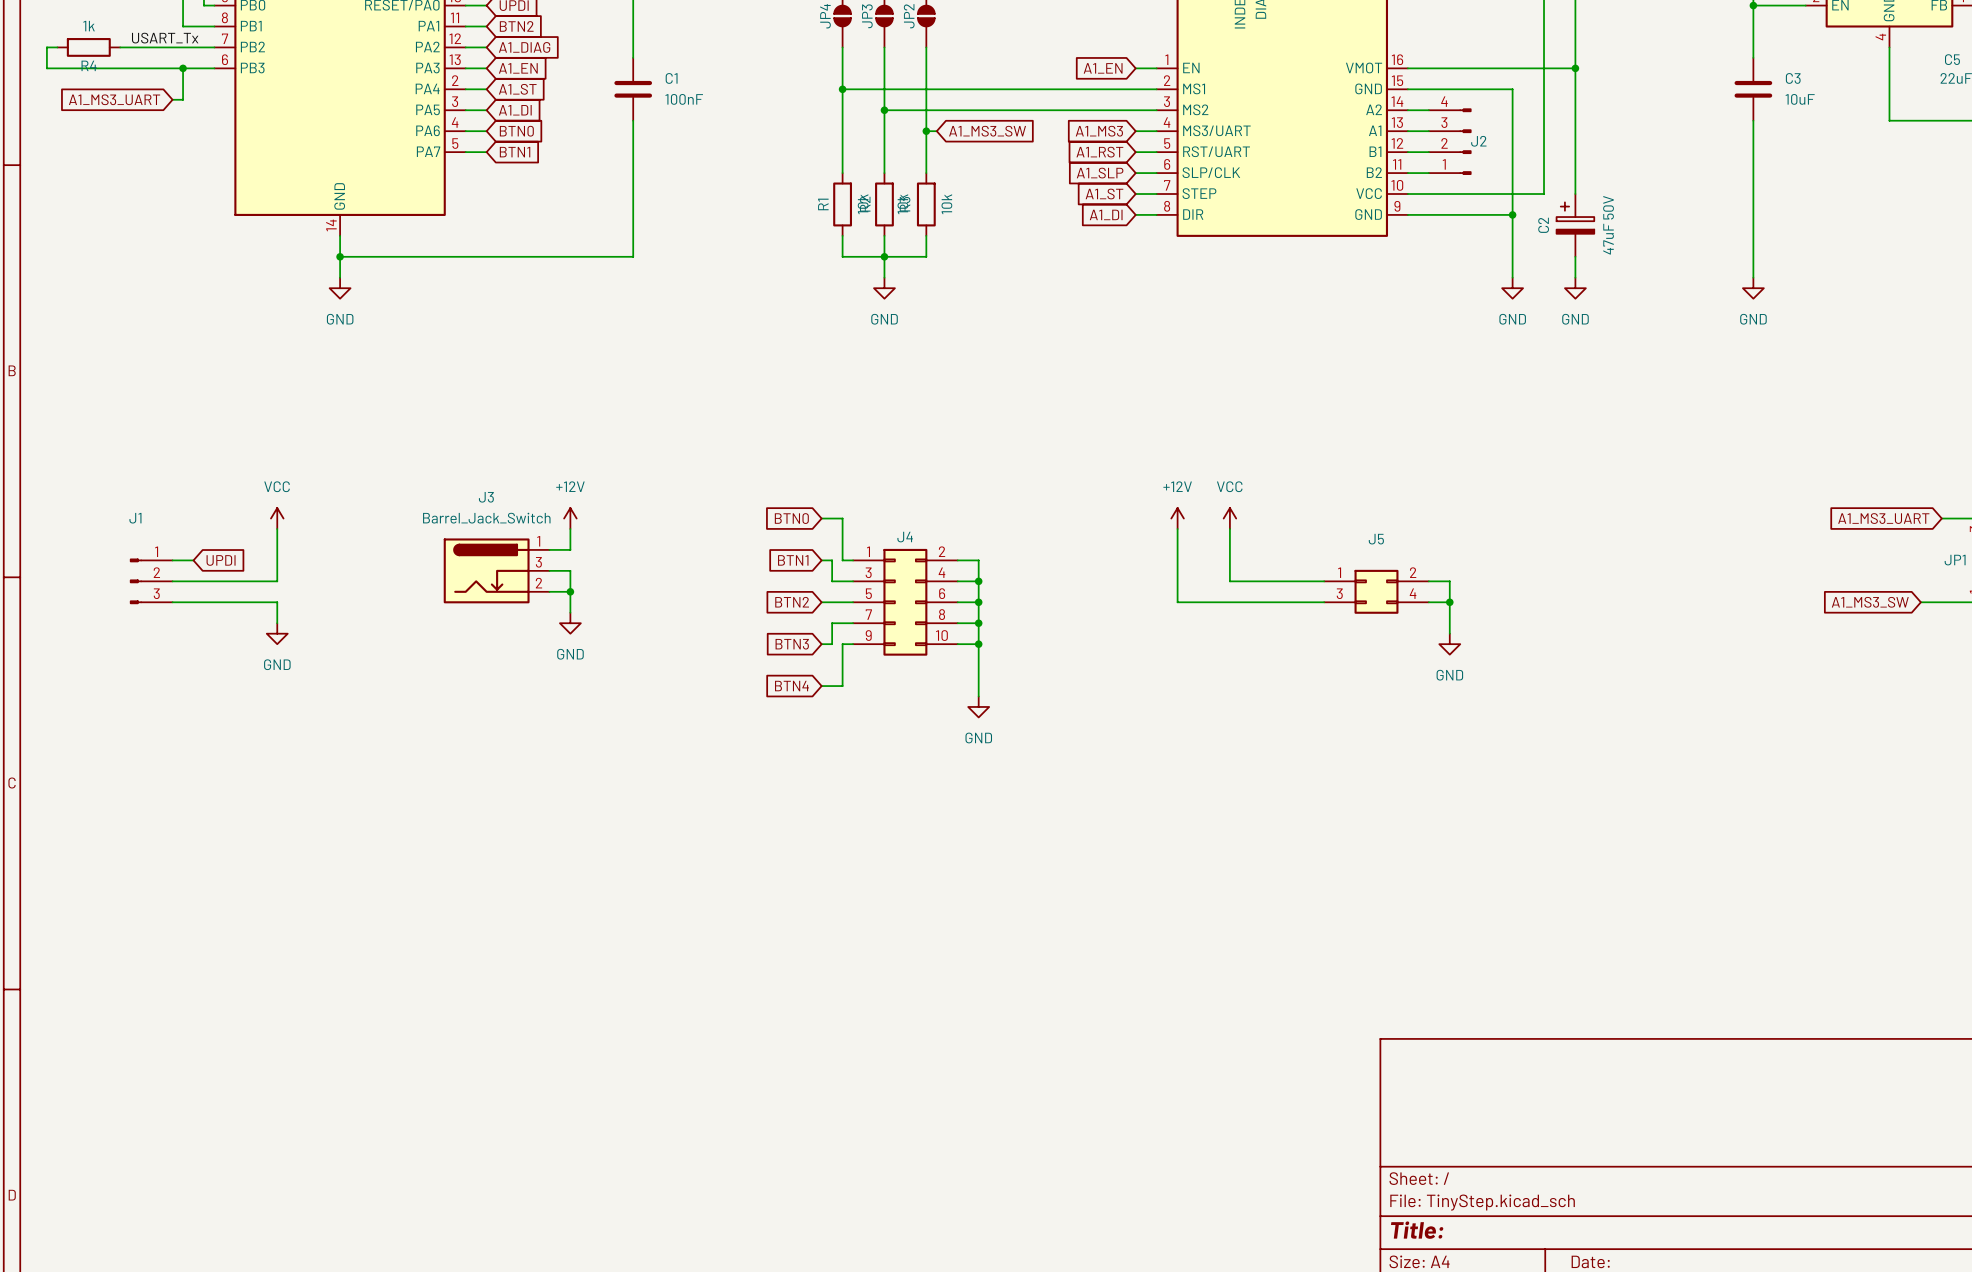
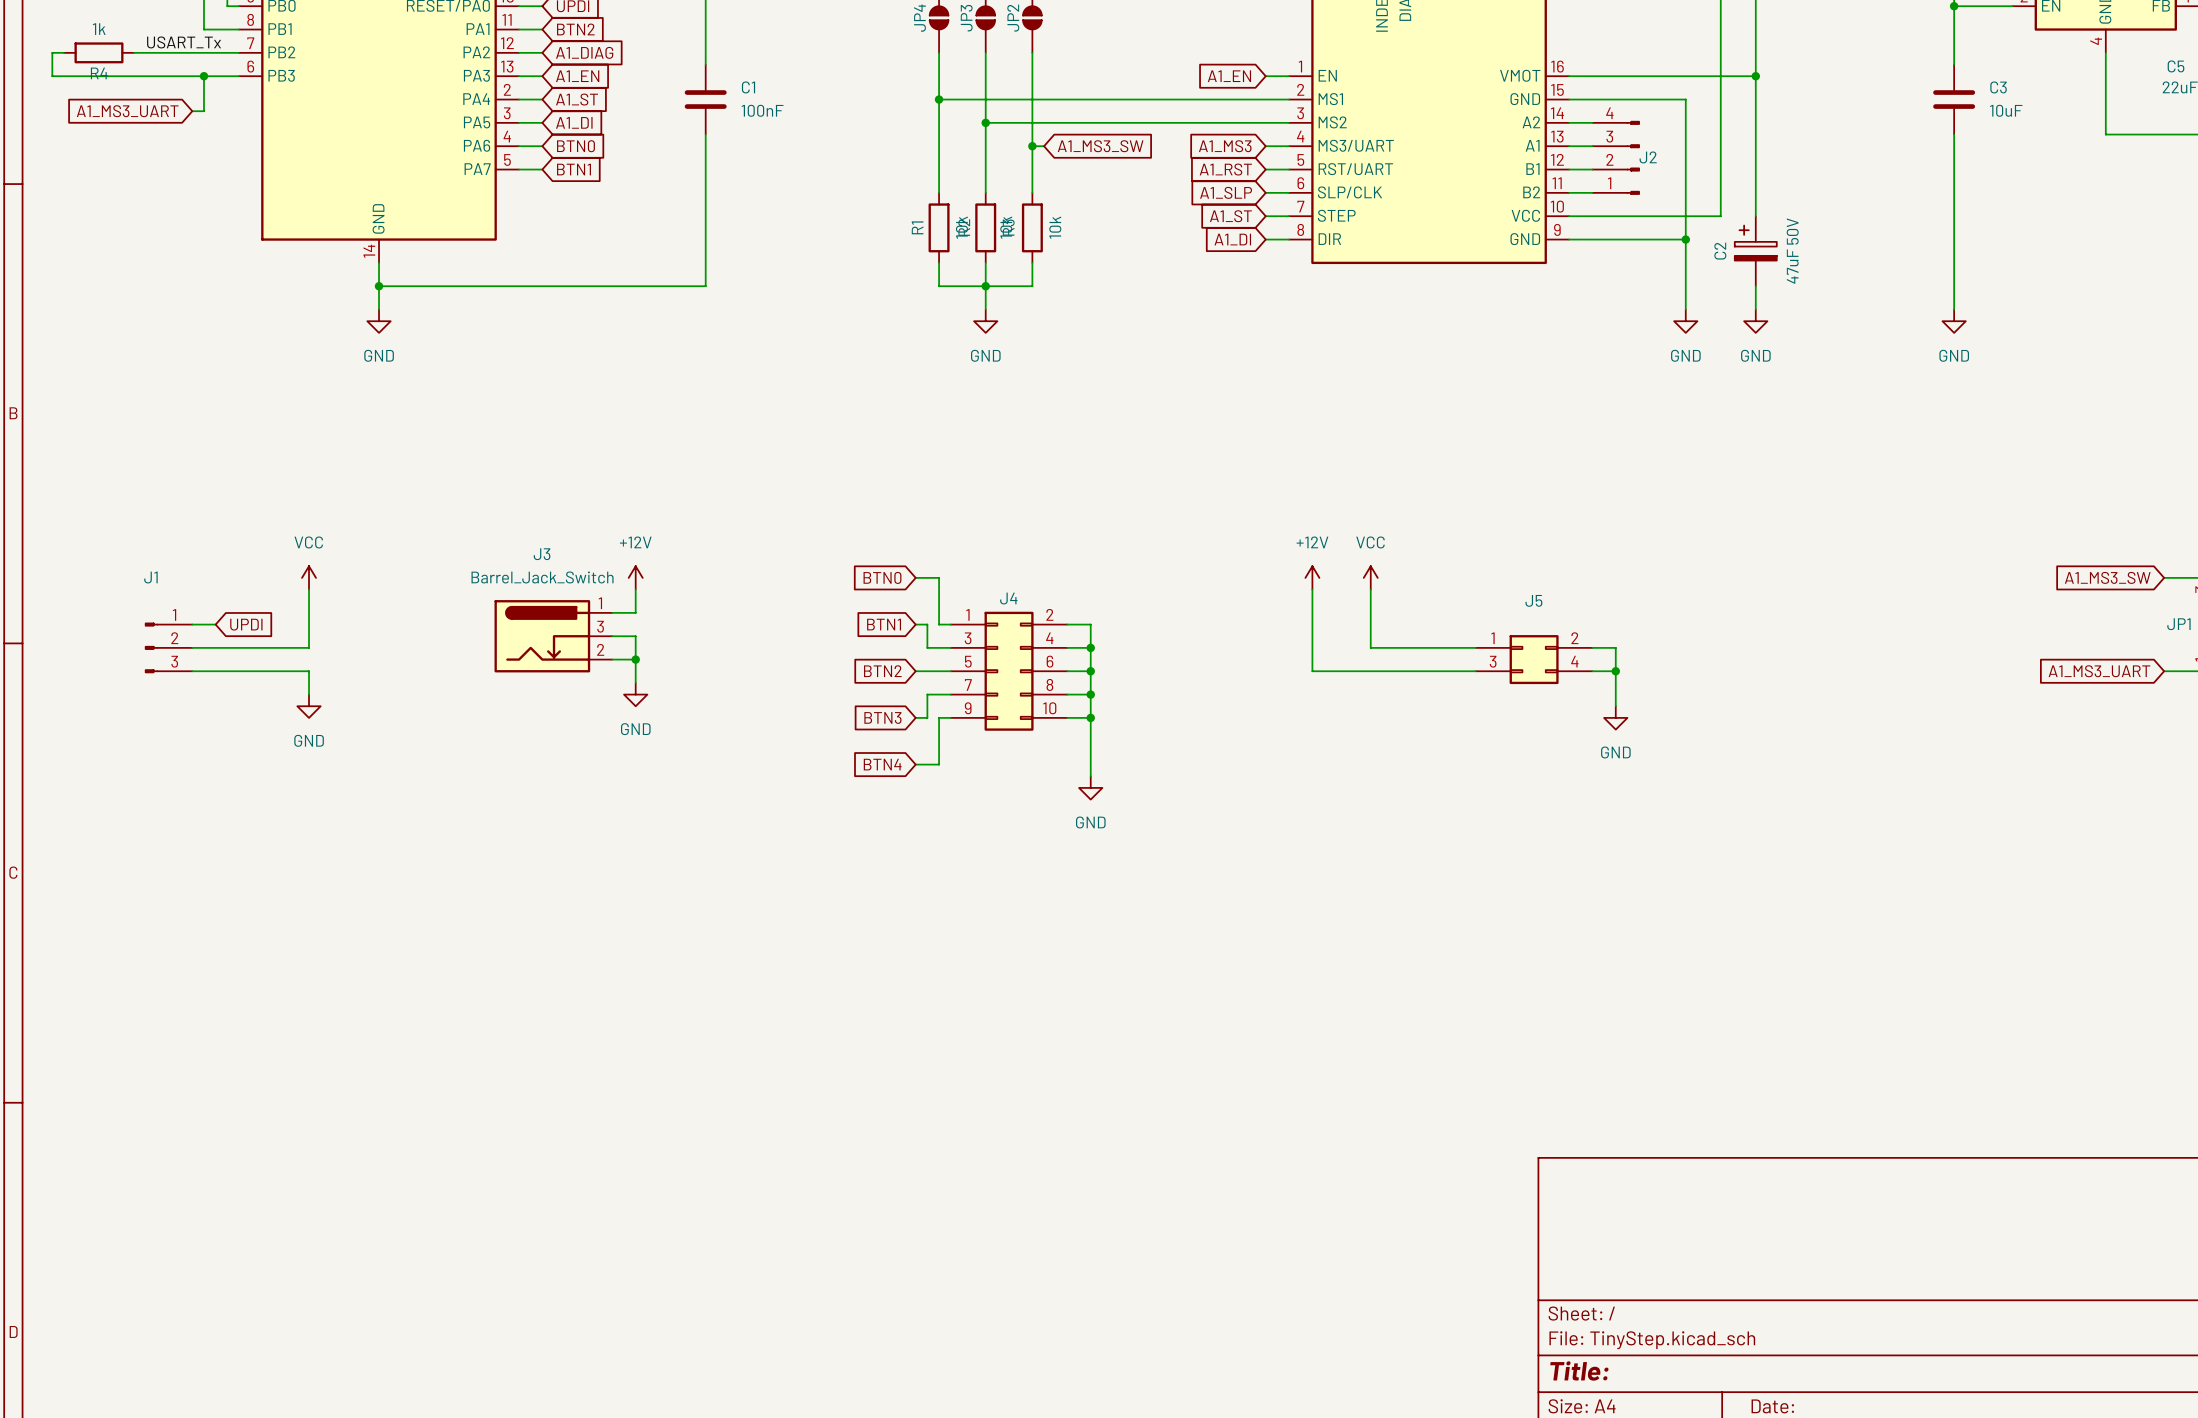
global label: A1_MS3_UART (1883, 518) -> A1_MS3_SW (2107, 577)
global label: A1_MS3_SW (1870, 602) -> A1_MS3_UART (2099, 671)
wire: (1920, 602) (1941, 602) -> none

